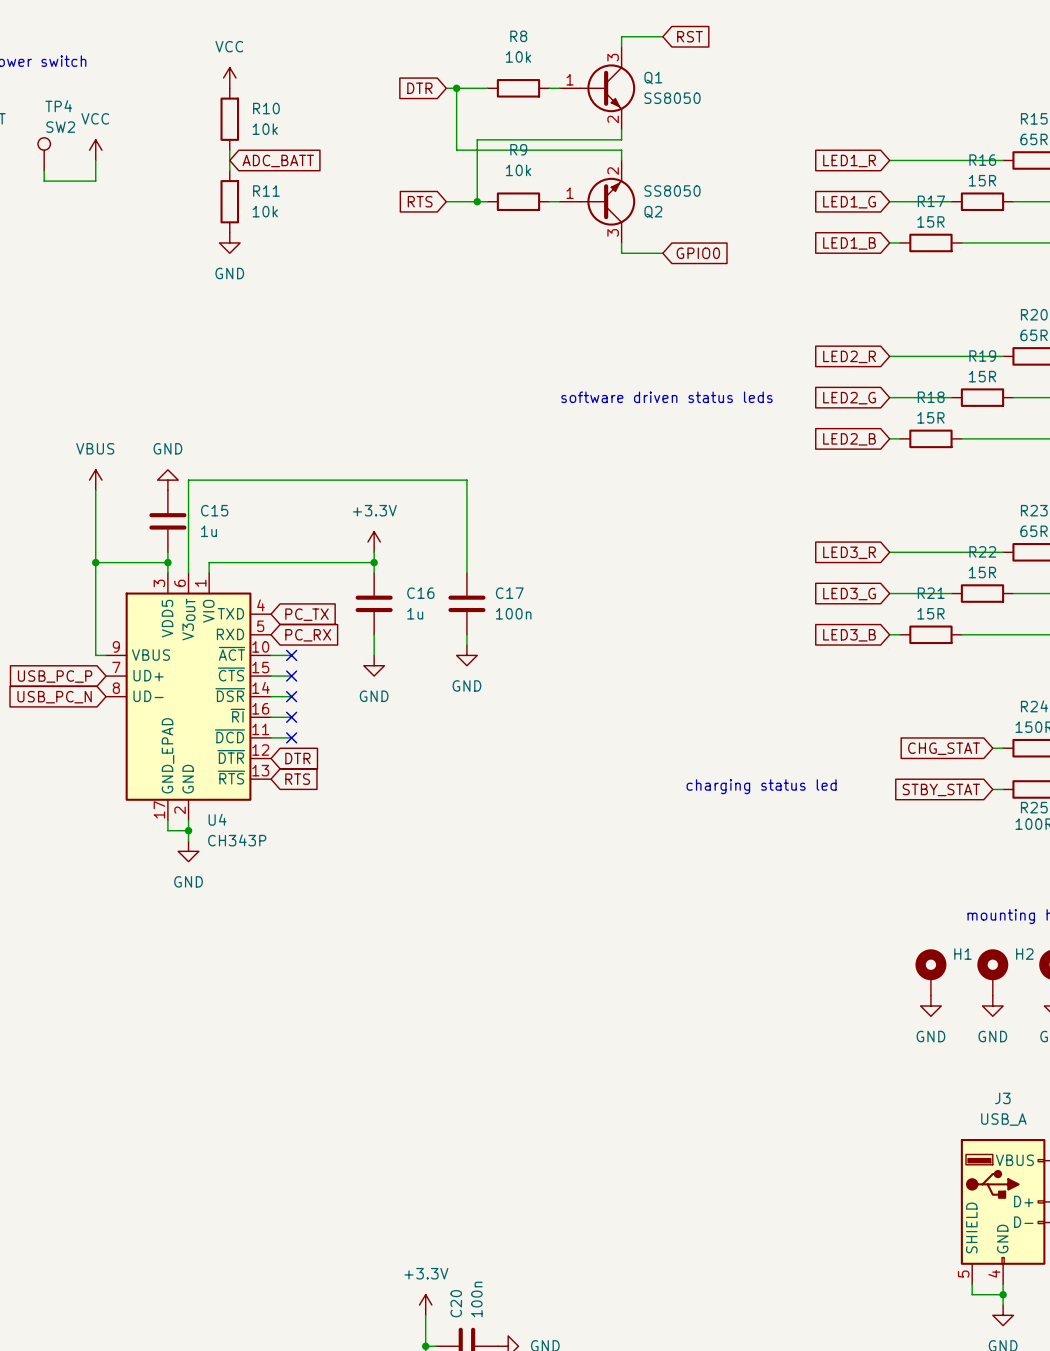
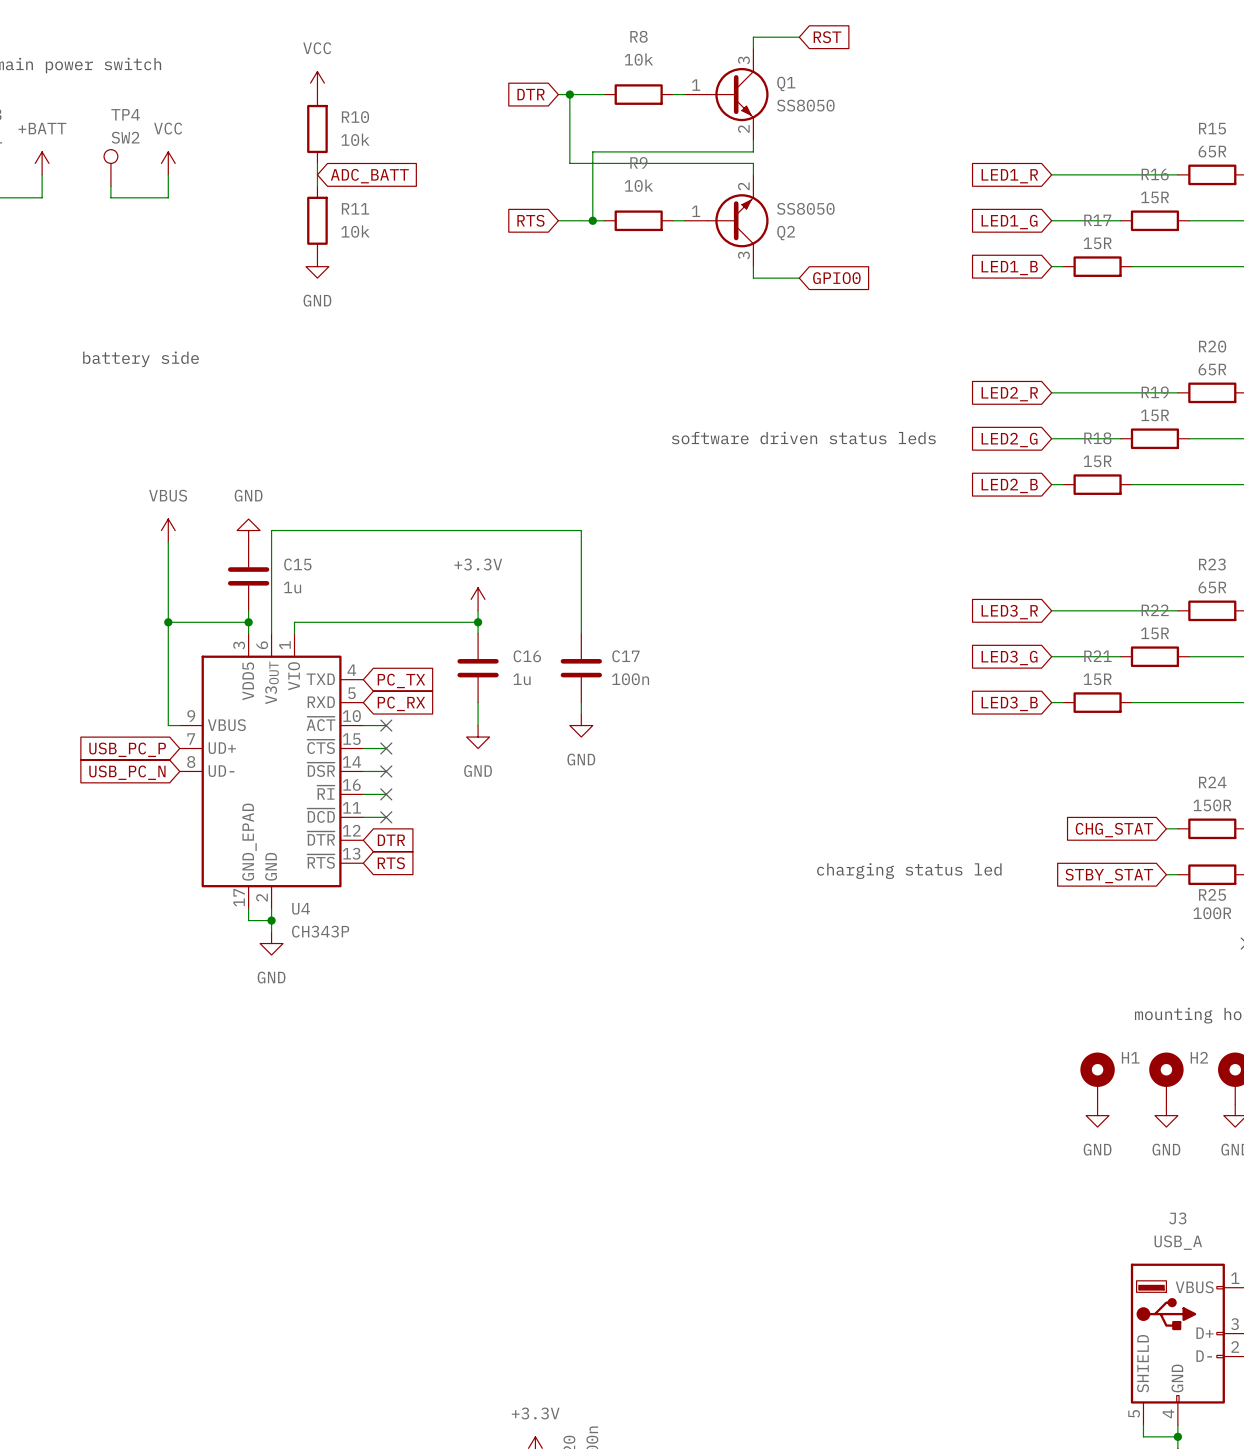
text: none -> battery side (141, 359)

